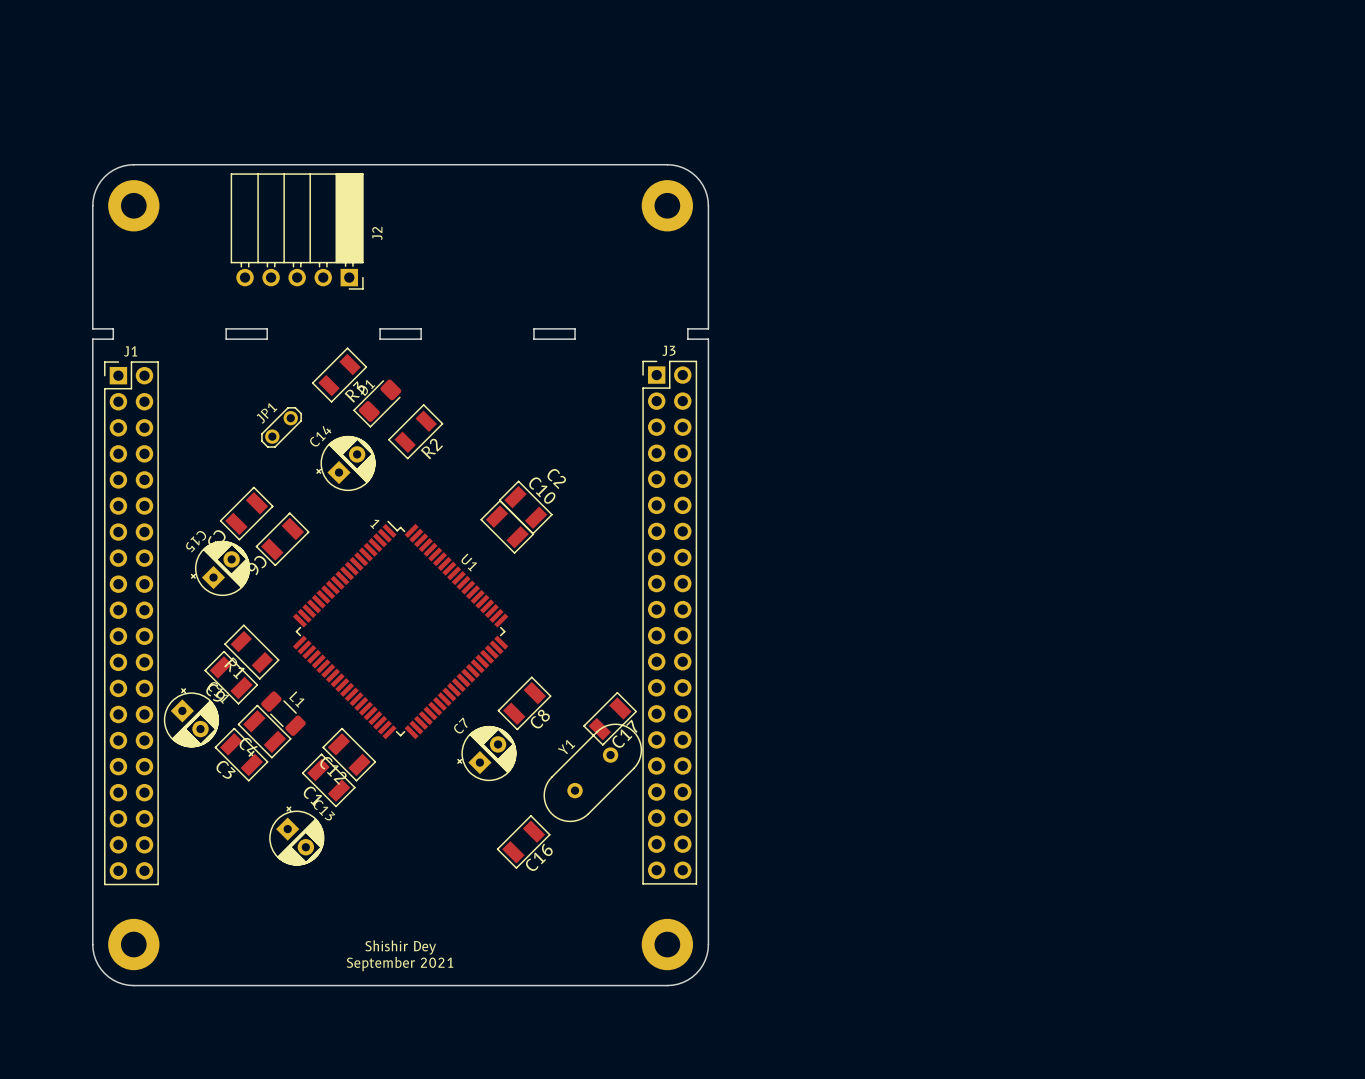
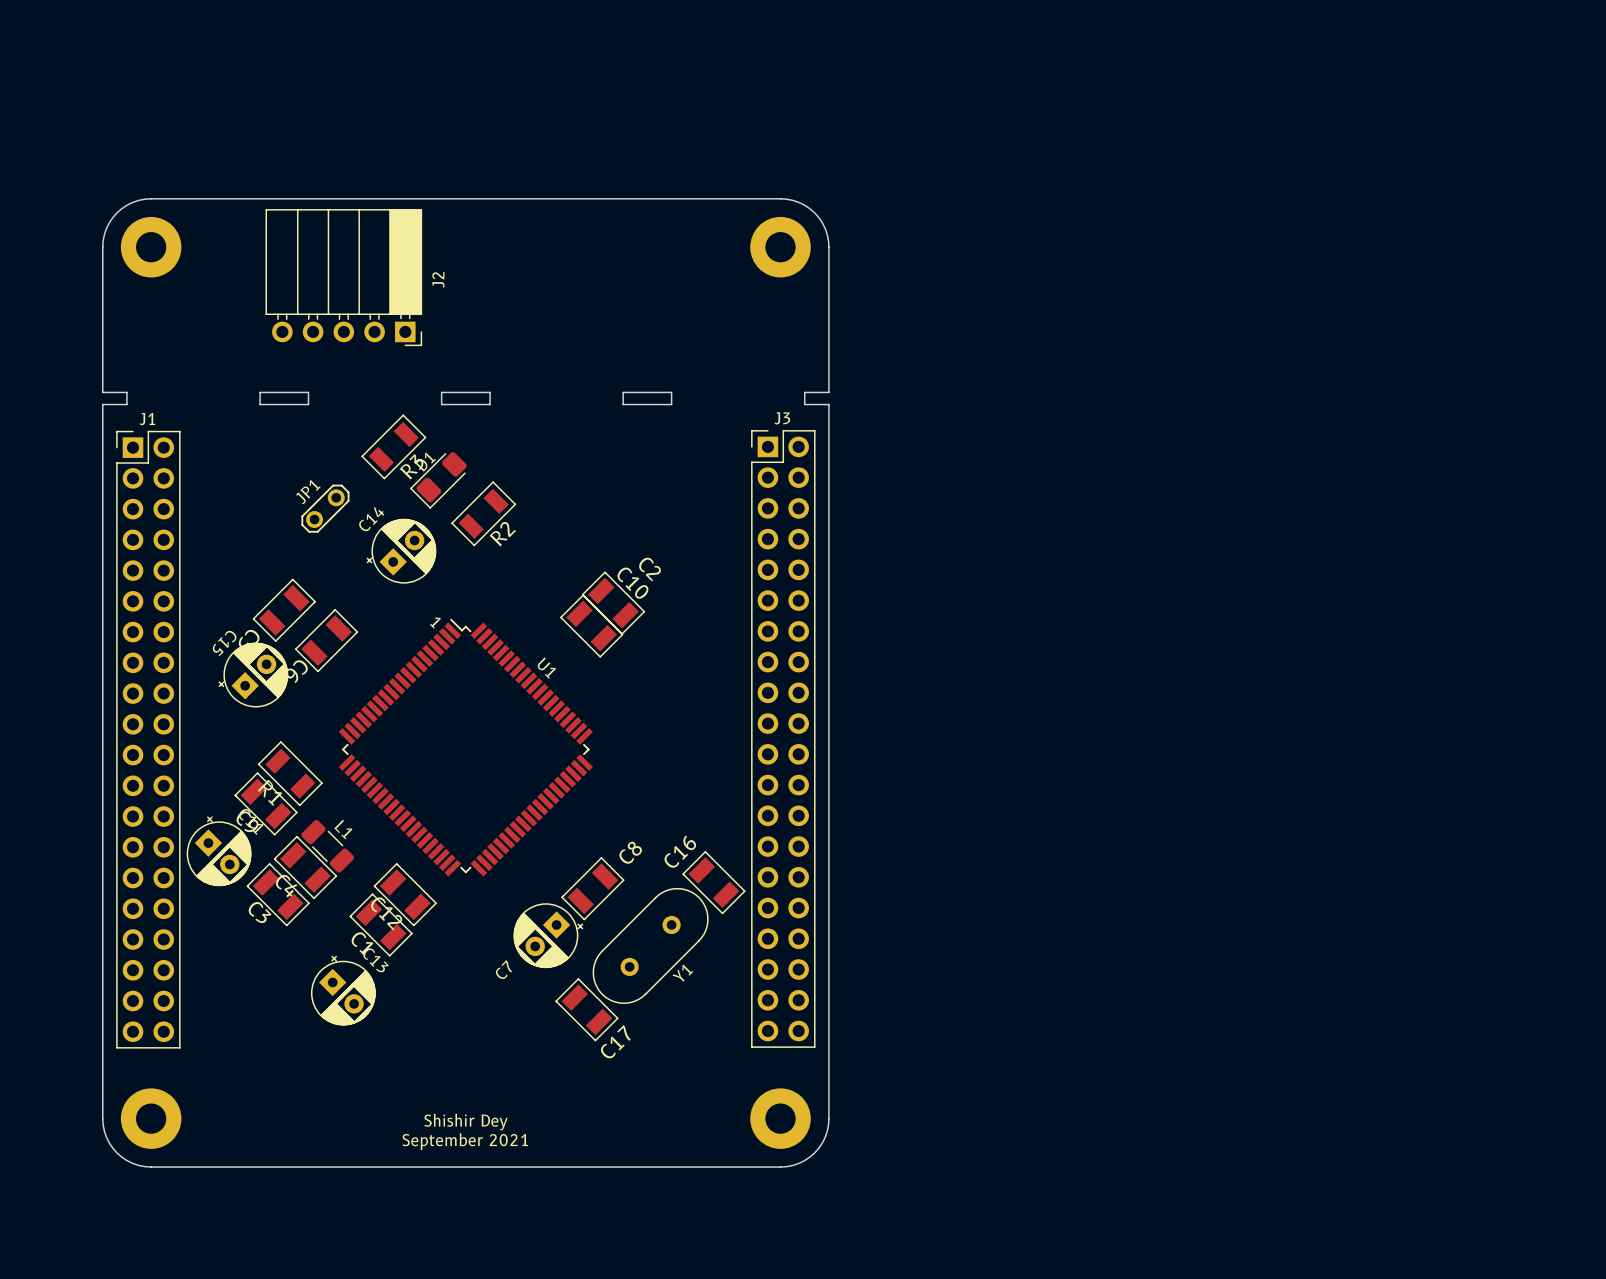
C8 position: (524, 703) -> (592, 888)
C17 rotation: 0° (610, 718) -> 90° clockwise (586, 1009)
C17 position: (610, 718) -> (586, 1009)
C7 name position: C7 (460, 725) -> C7 (503, 969)
Y1 name position: Y1 (566, 747) -> Y1 (682, 973)
C7 rotation: 0° (486, 753) -> 180° (548, 935)
C7 position: (486, 753) -> (548, 935)
Y1 position: (592, 772) -> (650, 945)
C16 rotation: 0° (523, 841) -> 90° clockwise (713, 882)
C16 position: (523, 841) -> (713, 882)
C16 name position: C16 (539, 857) -> C16 (680, 851)

